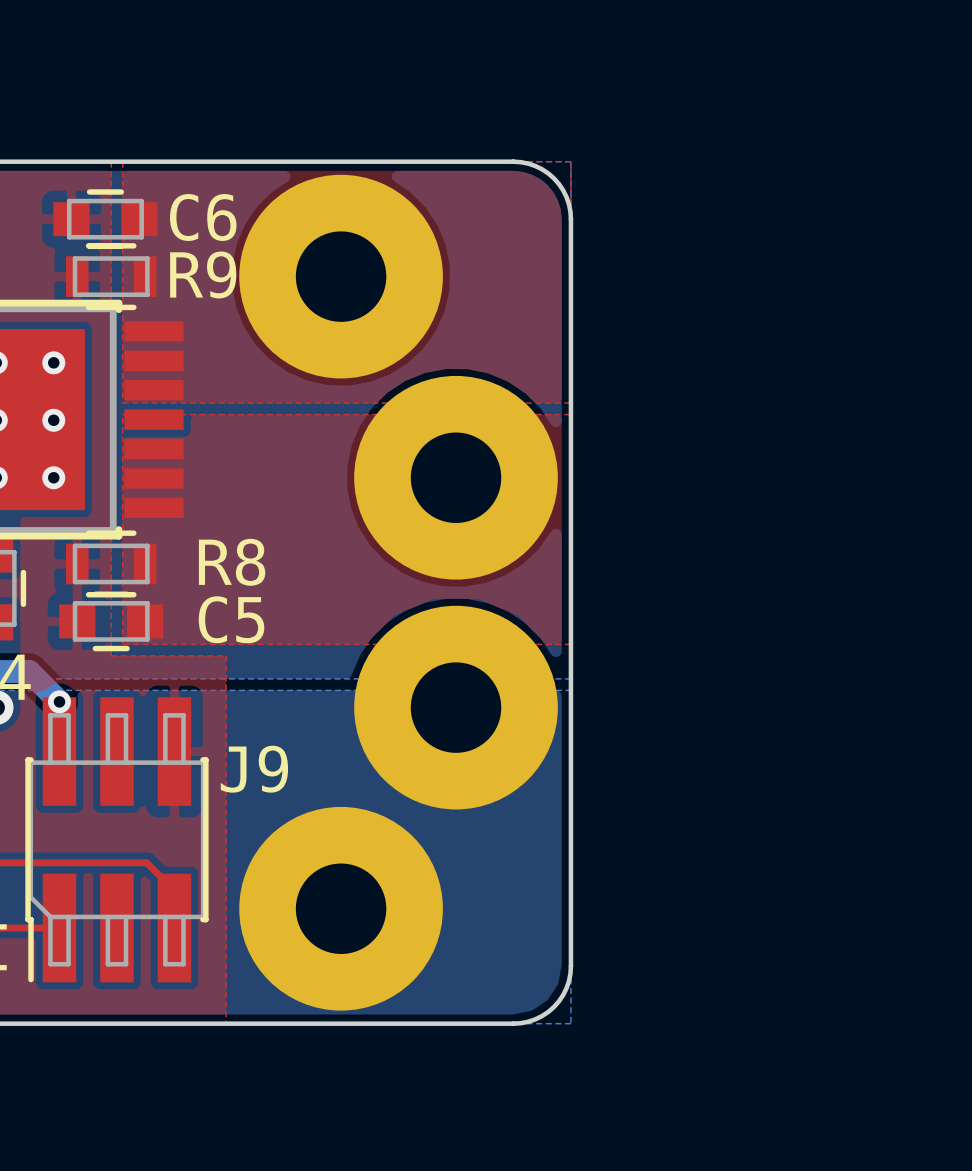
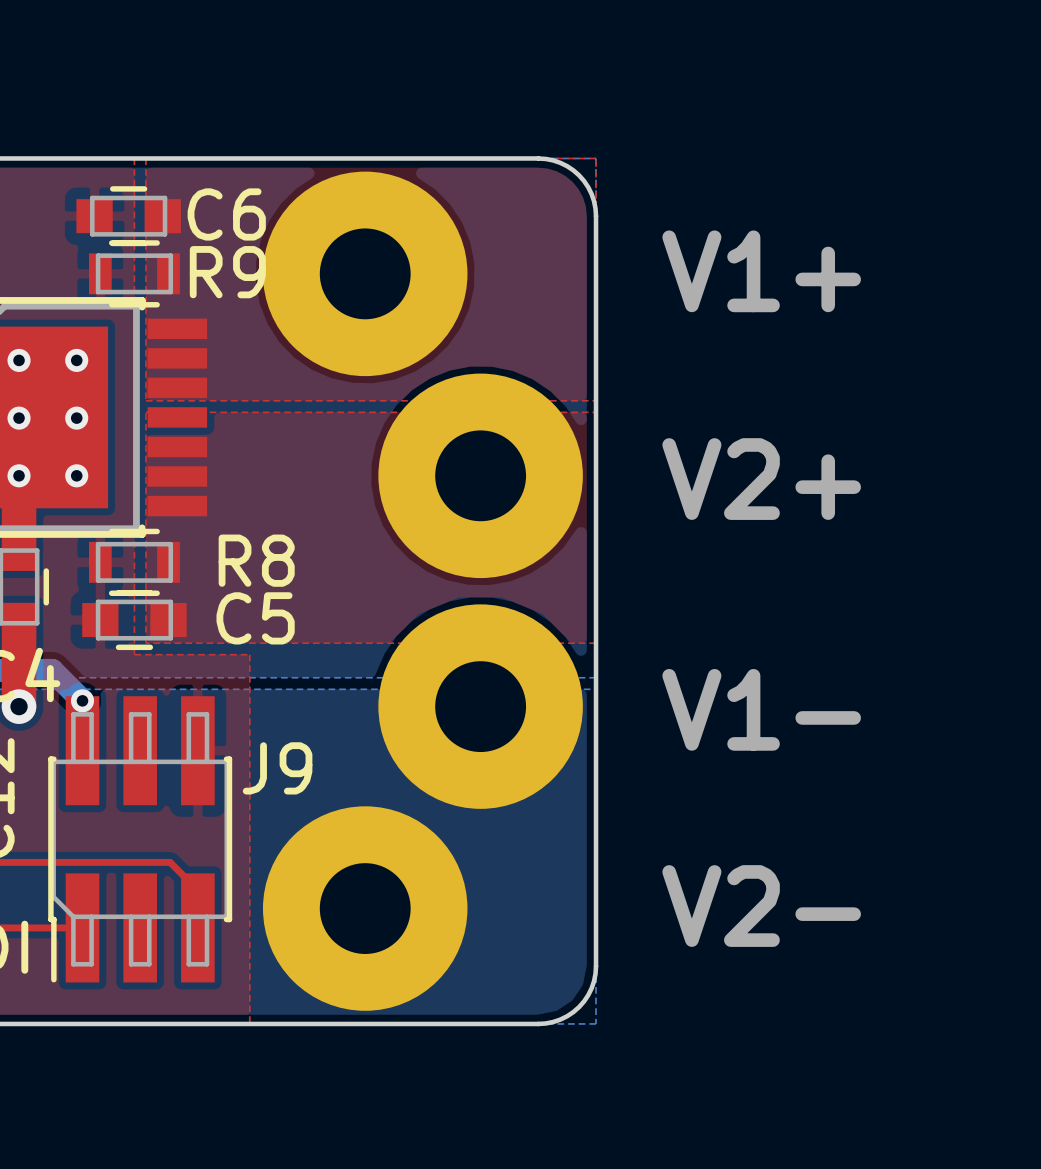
text: none -> V1+ (761, 271)
text: none -> V2+ (761, 479)
text: none -> V1- (761, 709)
text: none -> V2- (761, 906)

